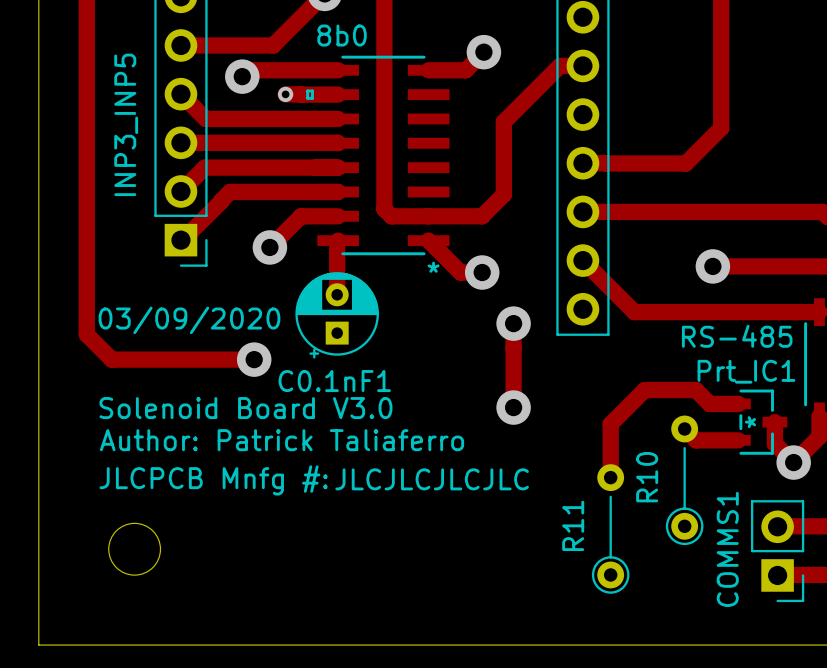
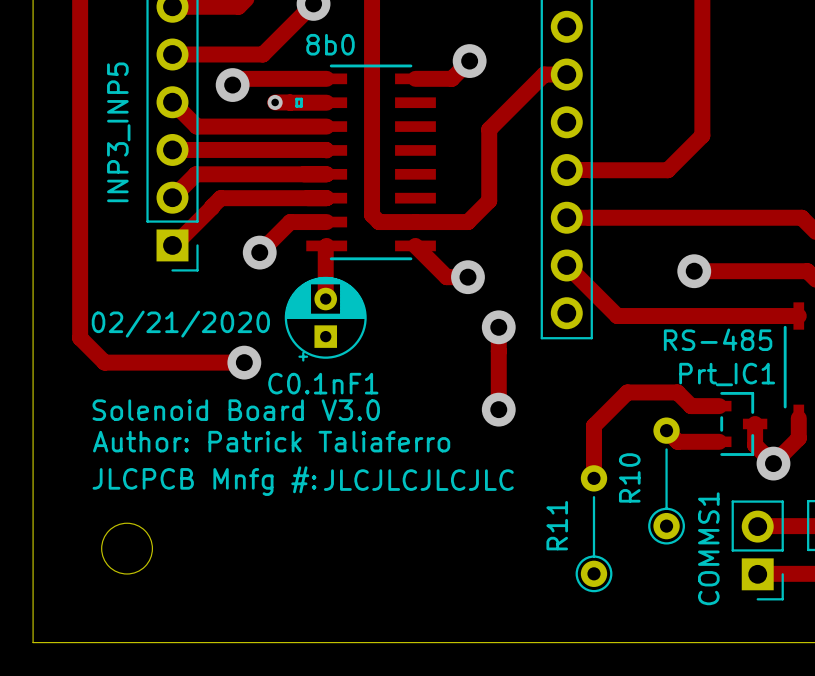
8b0 text: * (433, 267) -> none
text: 03/09/2020 (189, 320) -> 02/21/2020 (180, 324)
Prt_IC1 text: * (750, 422) -> none

